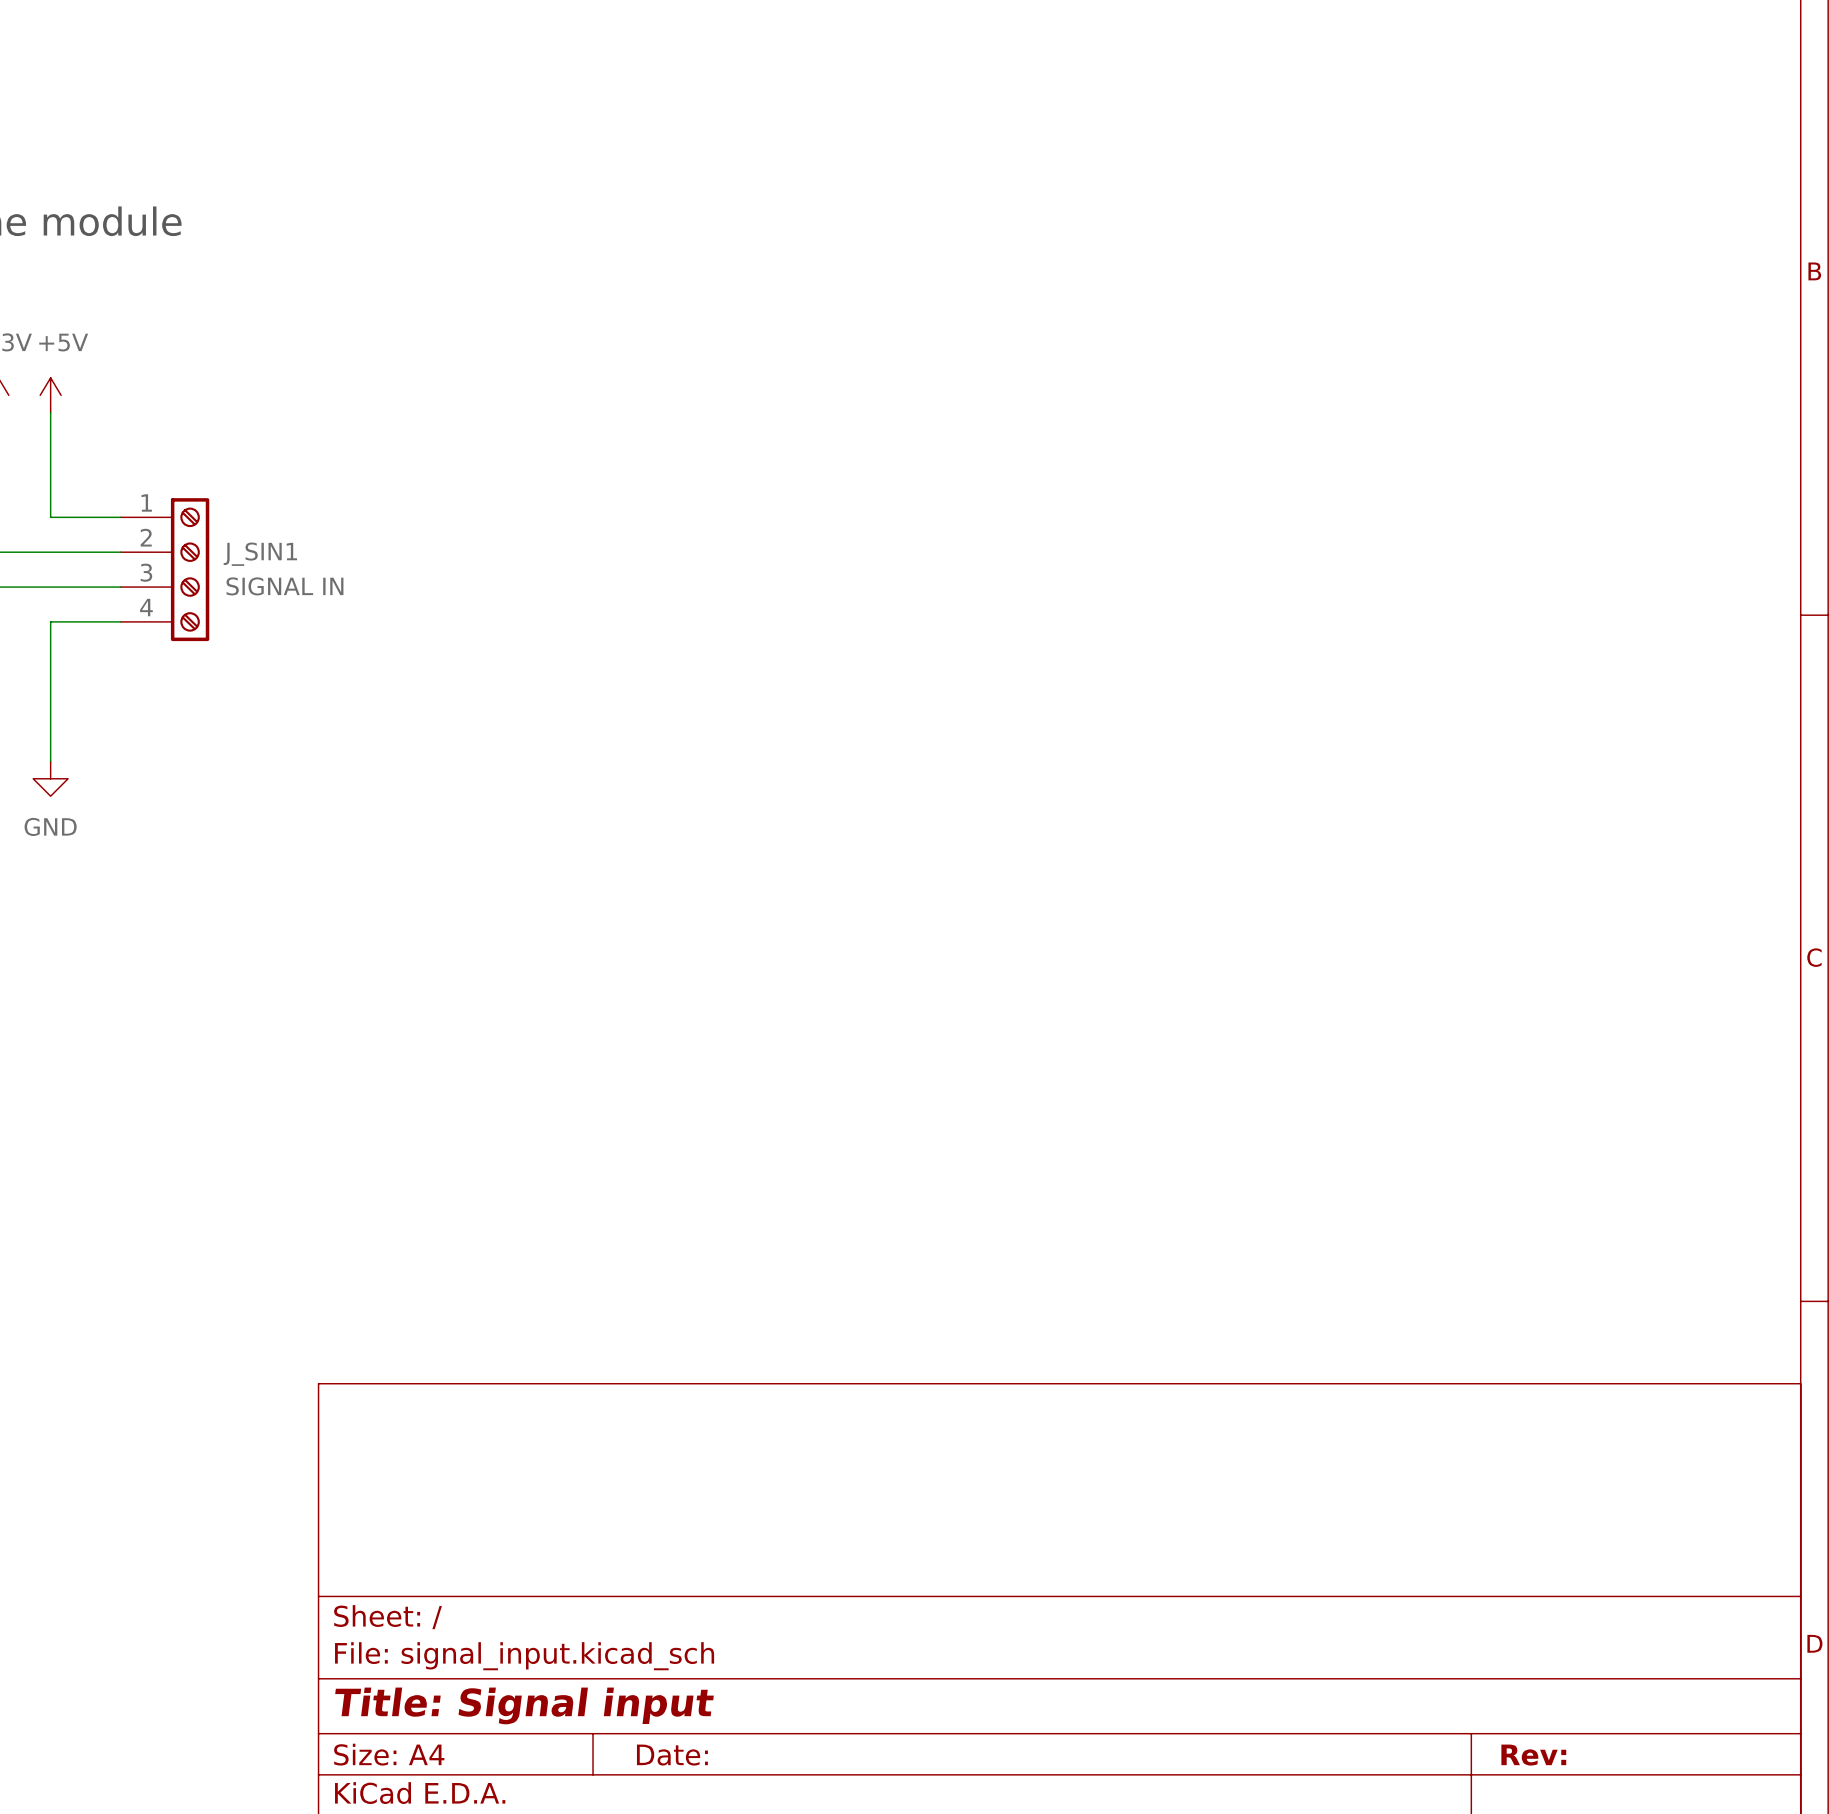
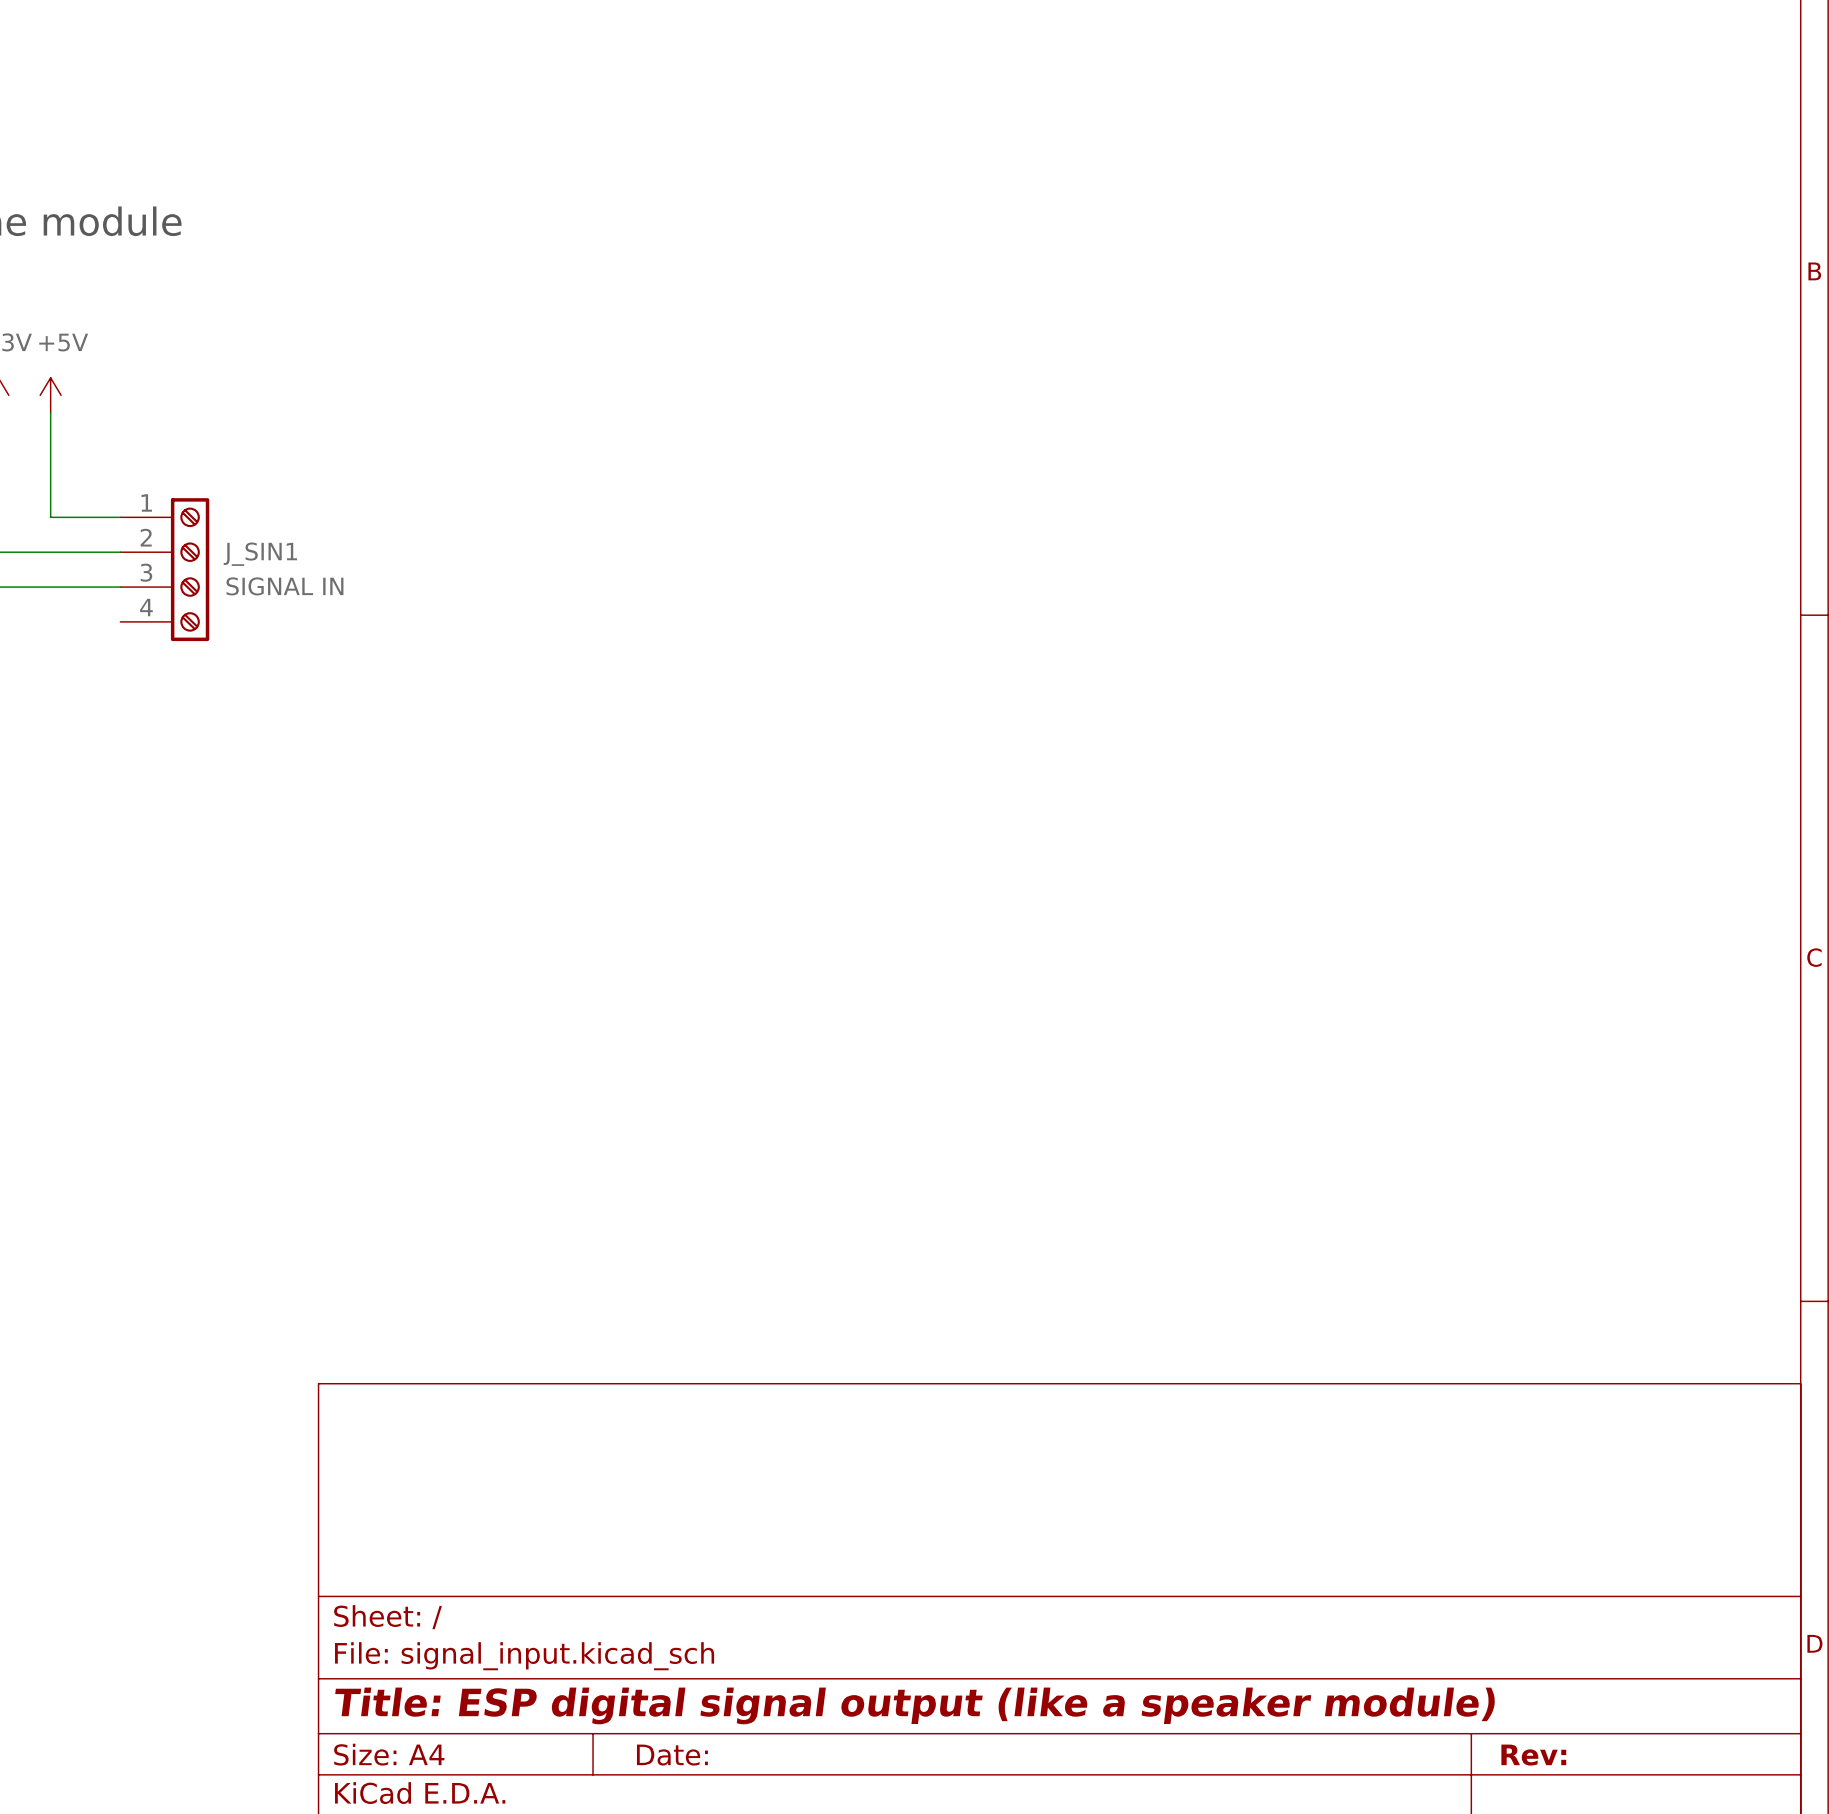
wire: (120, 621) (50, 621) (50, 761) -> none
power symbol: GND (50, 778) -> none
title block: Title: Signal input (524, 1705) -> Title: ESP digital signal output (like a speaker module) (915, 1705)

